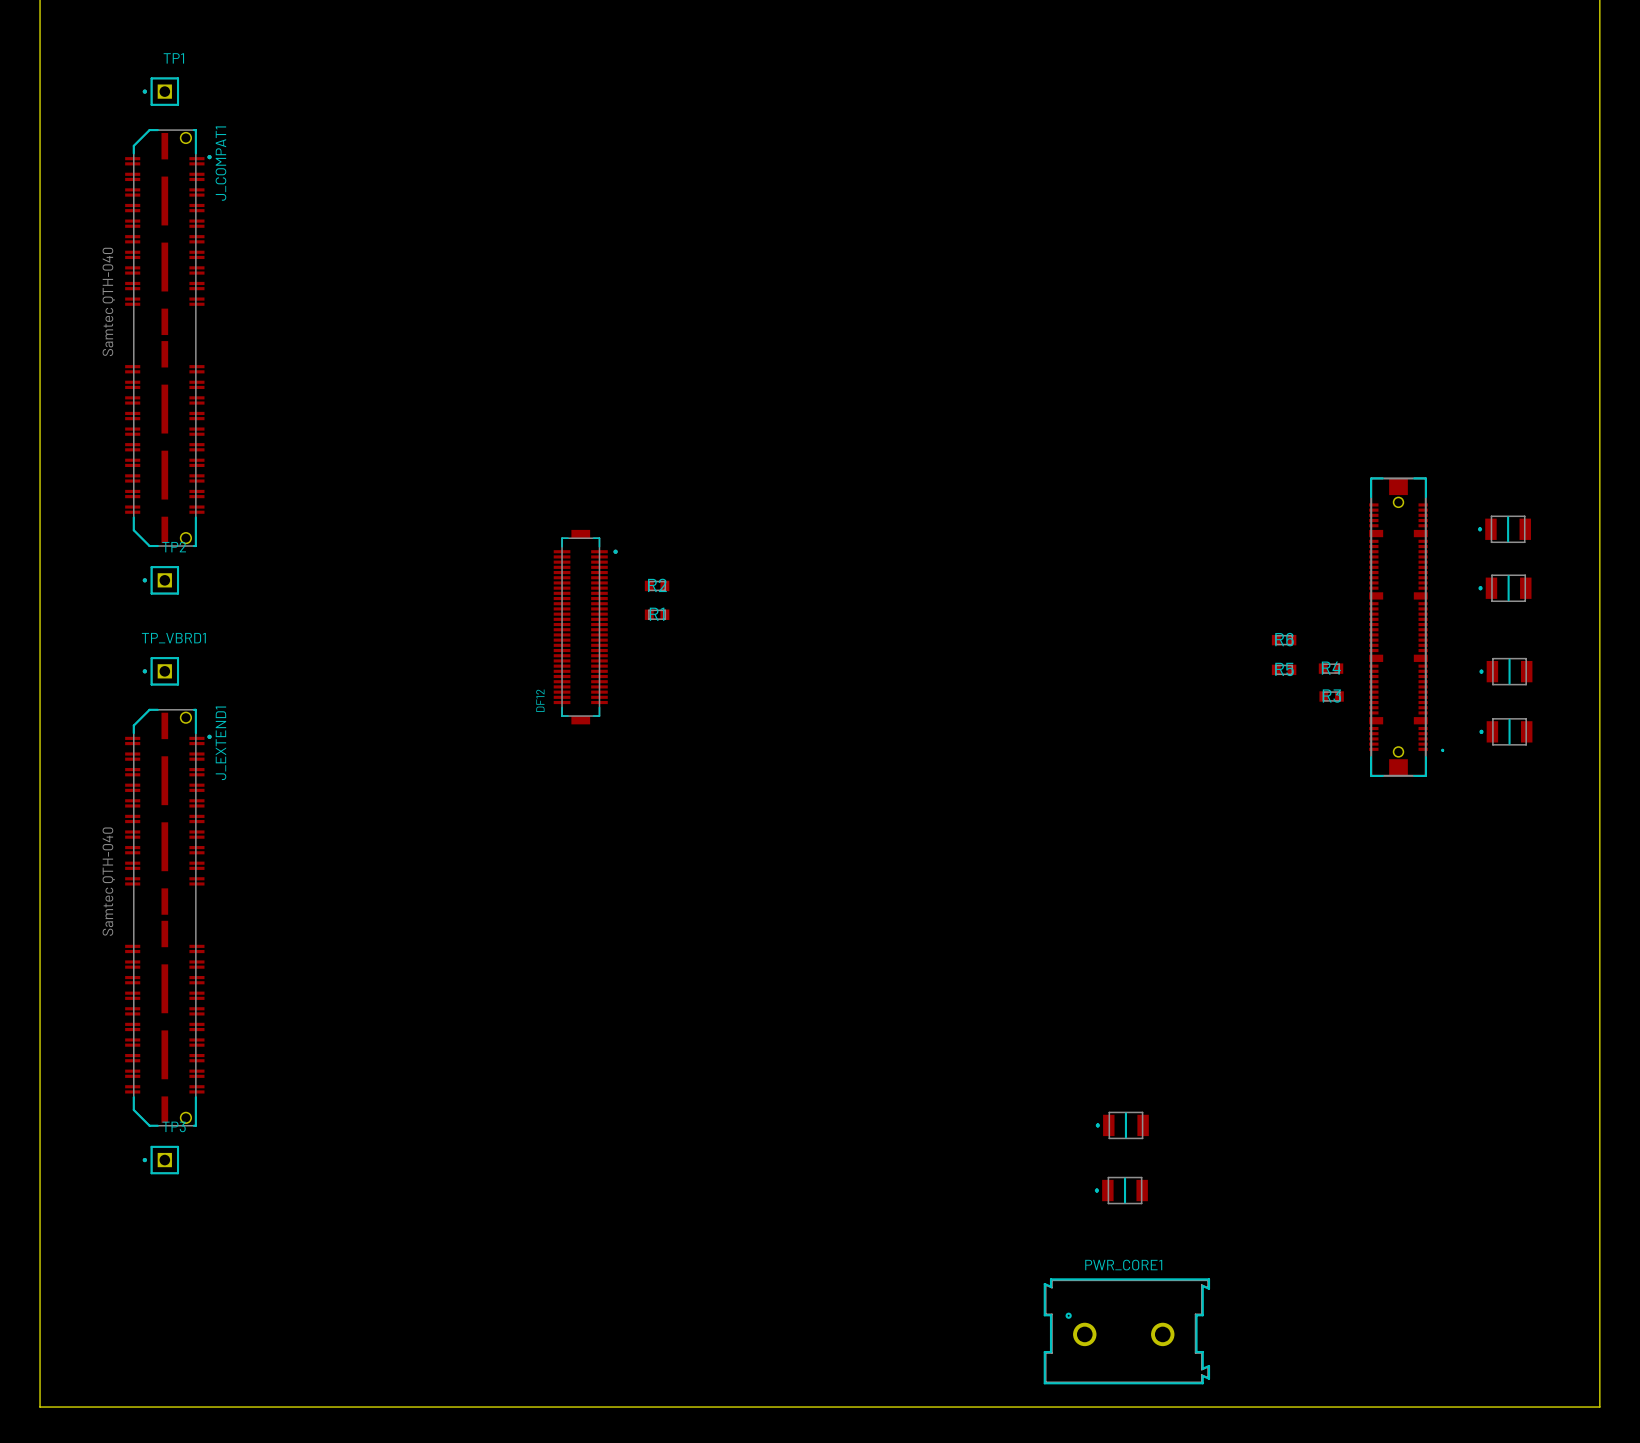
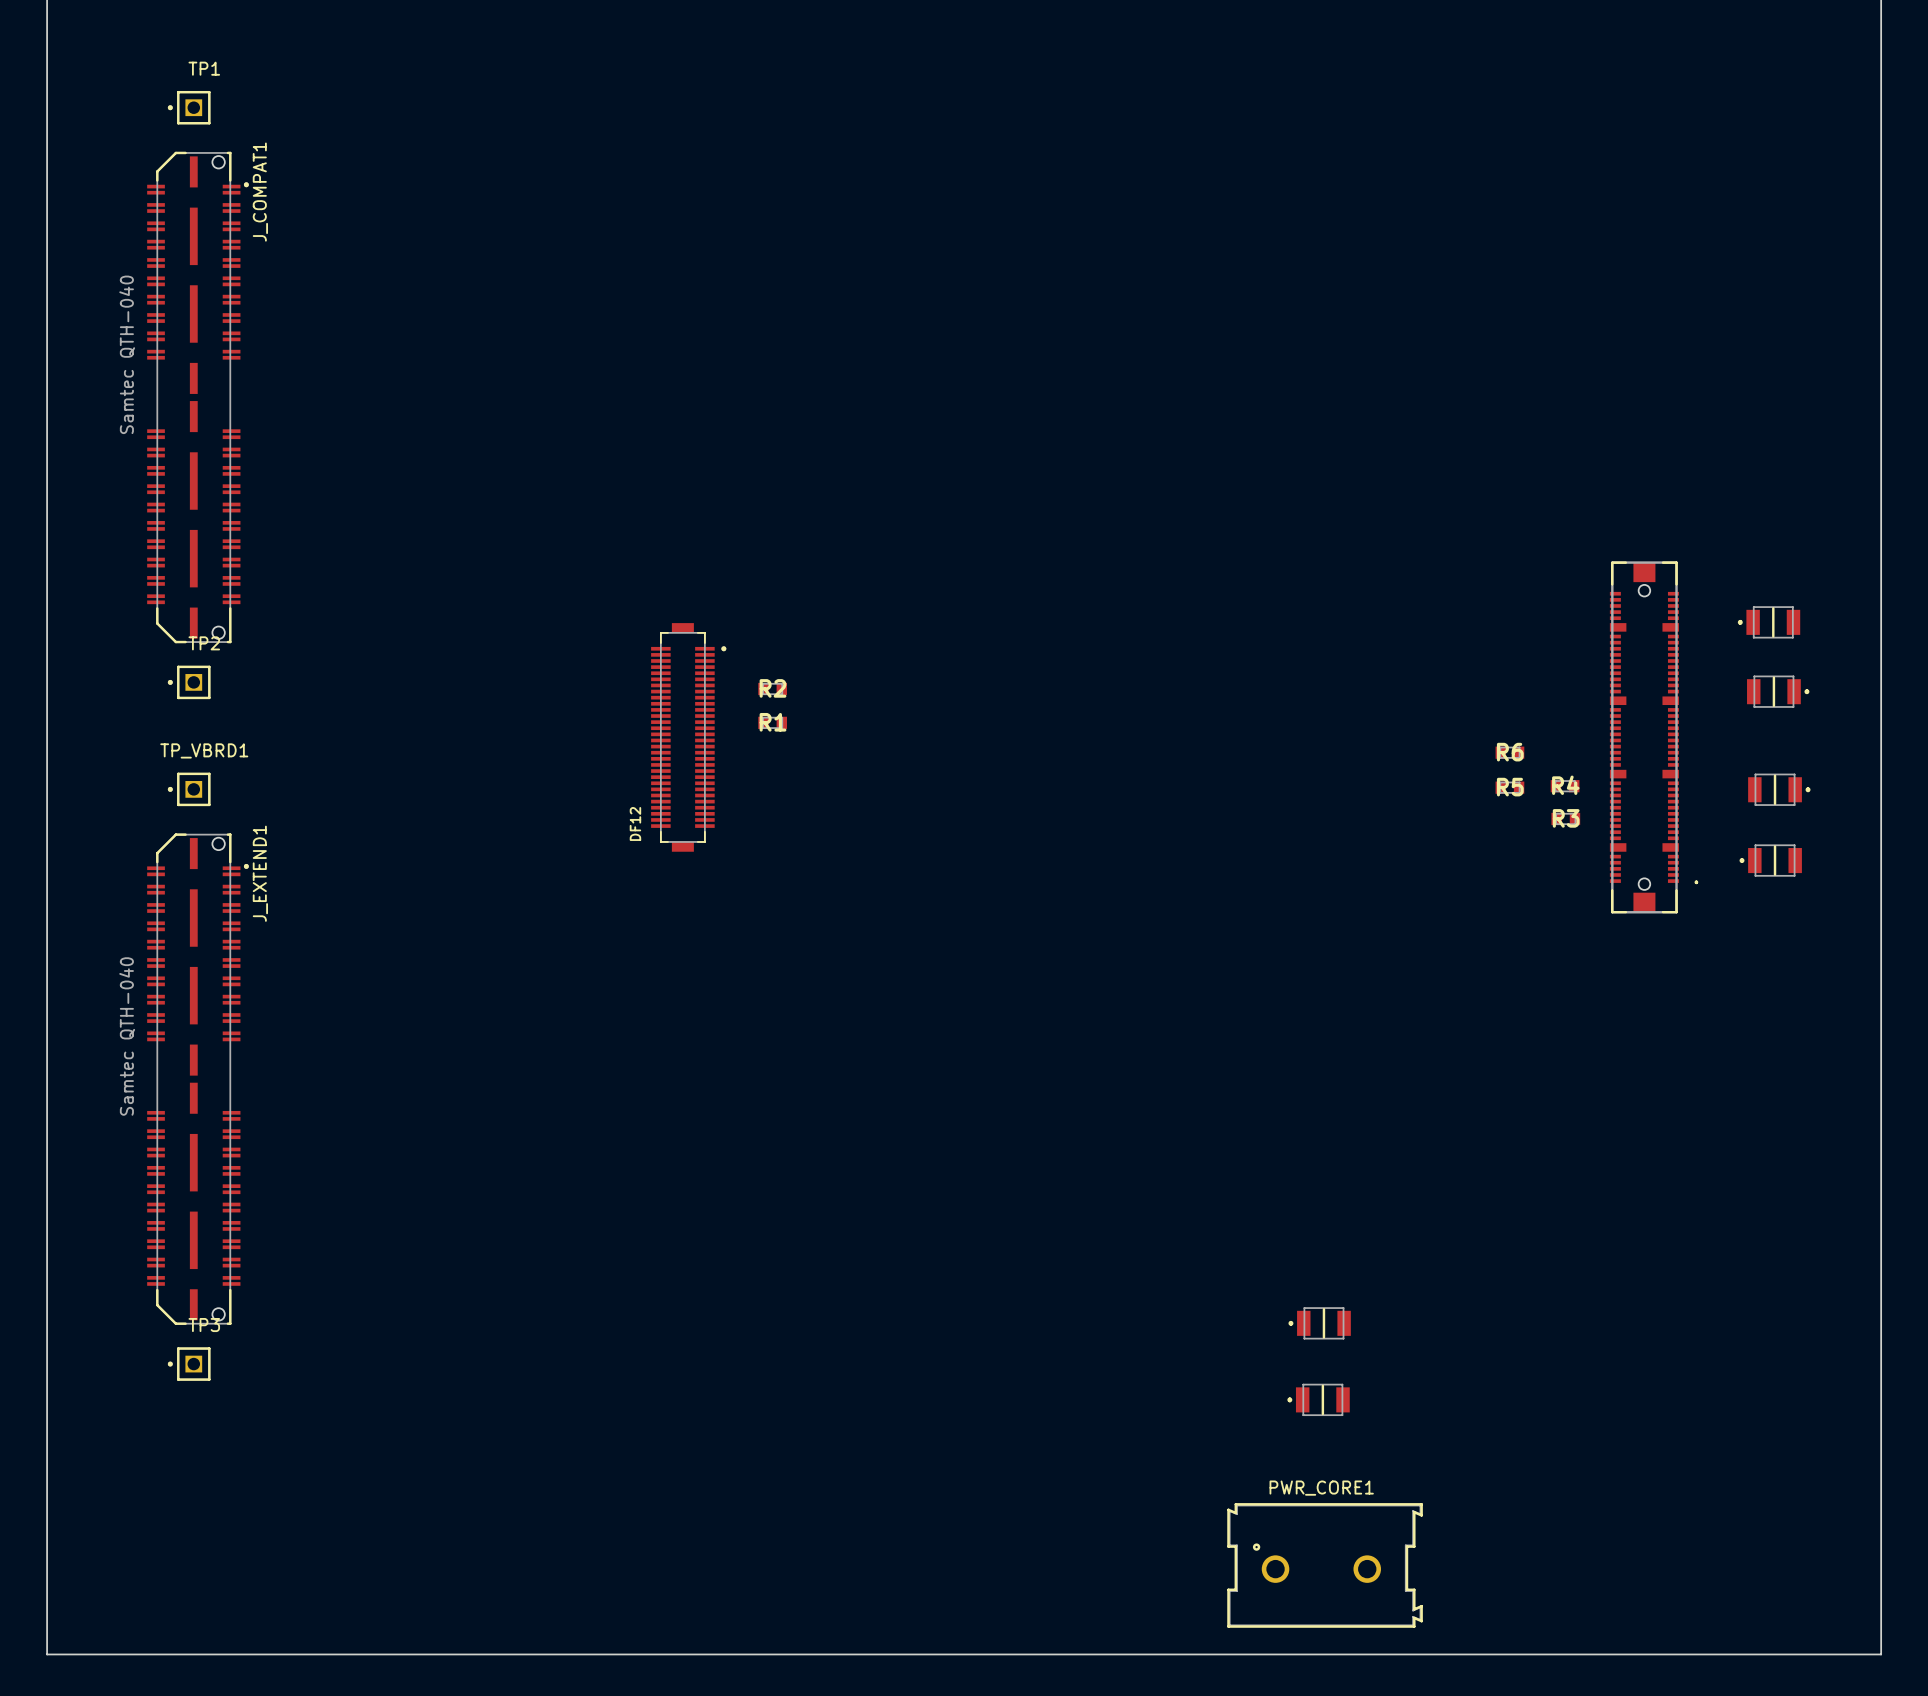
part rotation: 0° (1504, 588) -> 180° (1778, 691)
part rotation: 0° (1505, 671) -> 180° (1779, 789)

